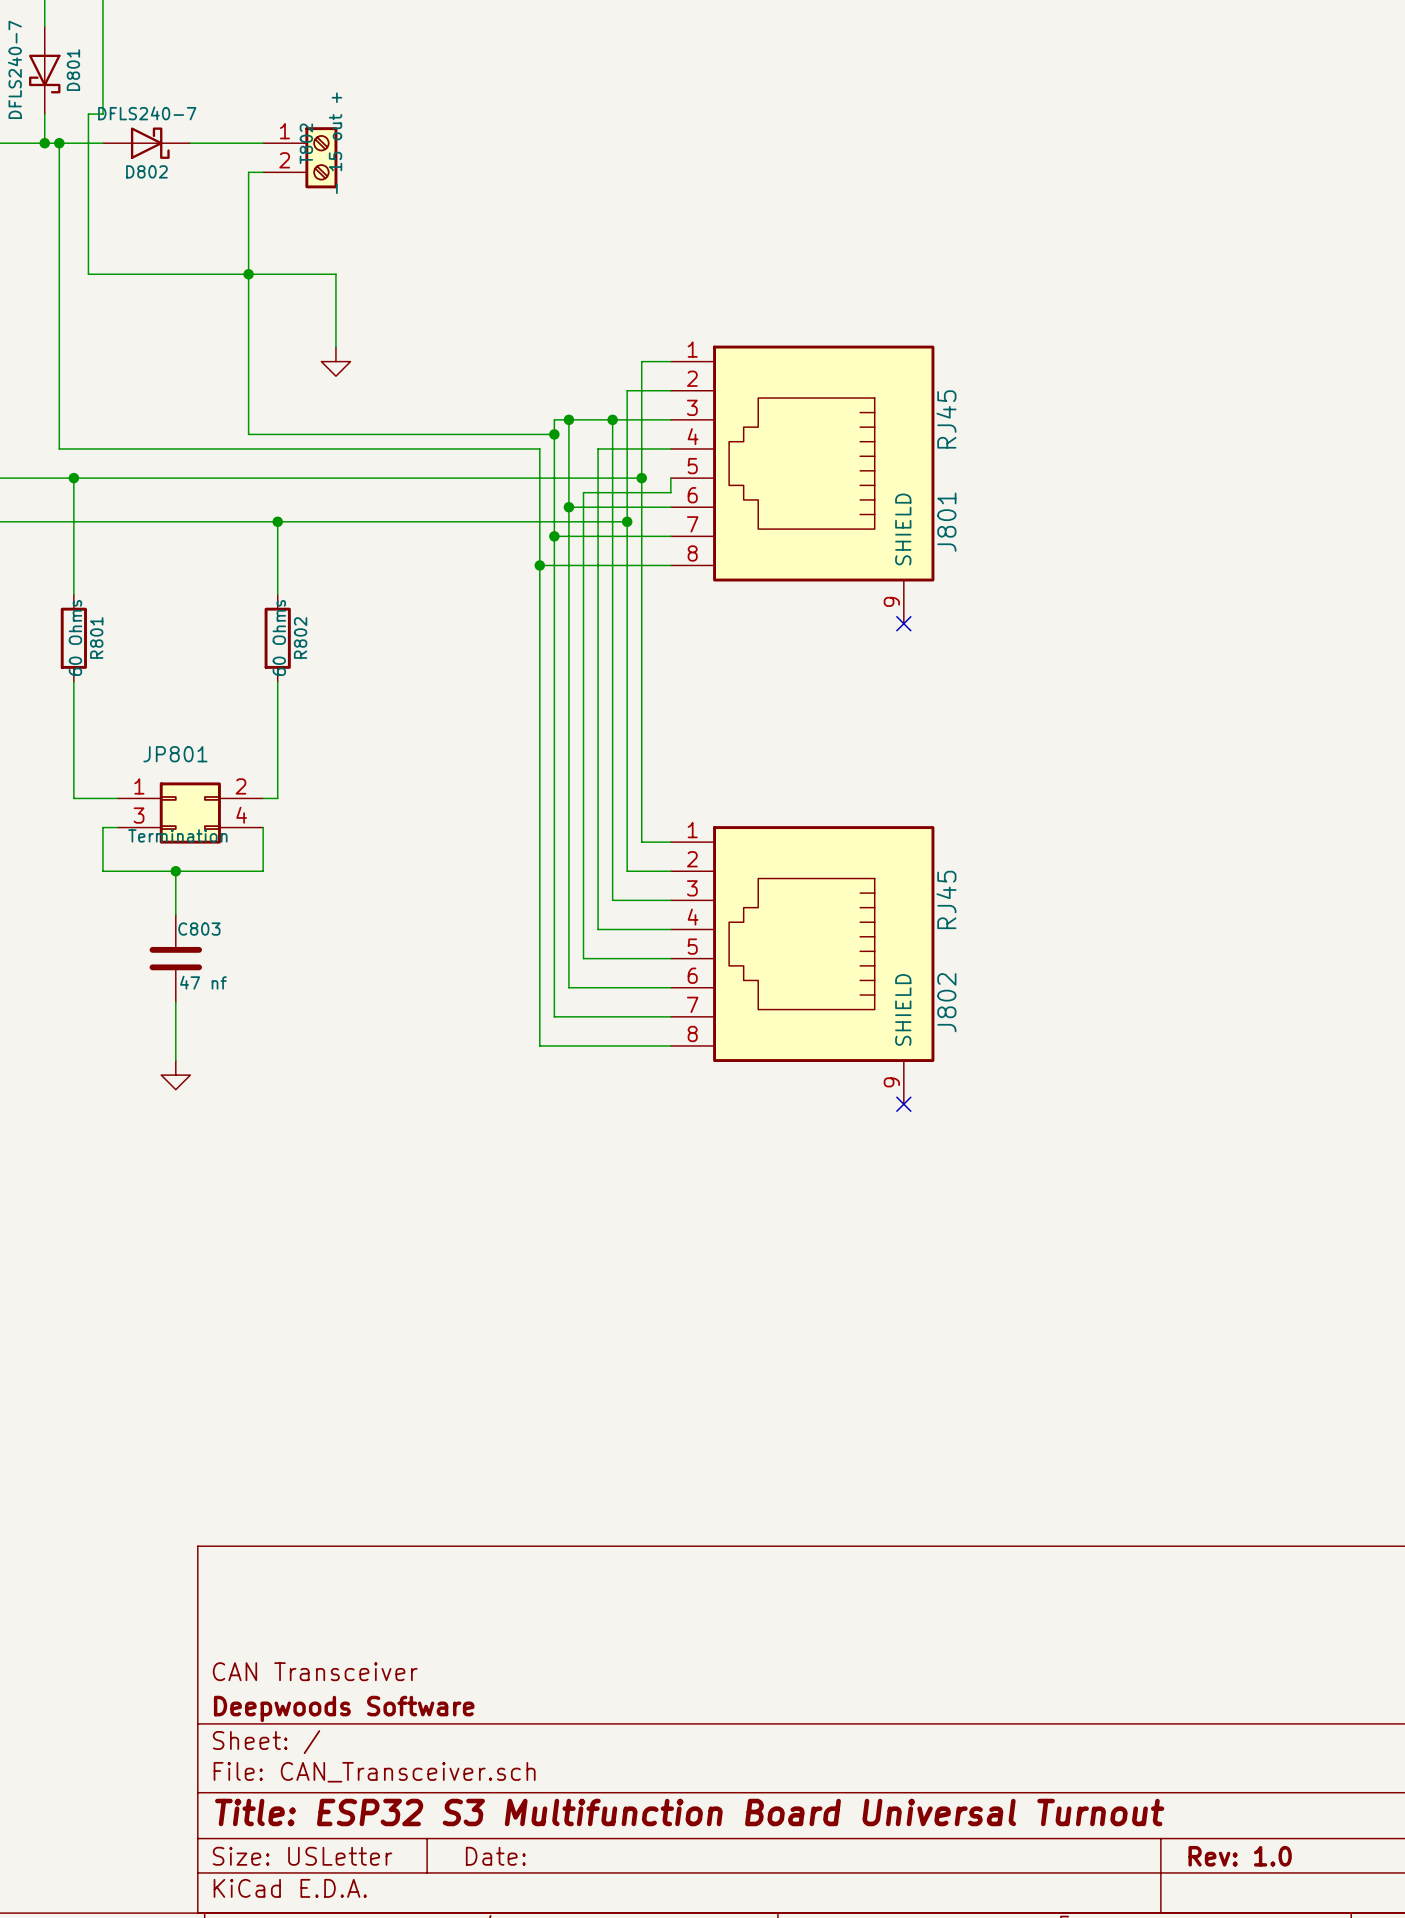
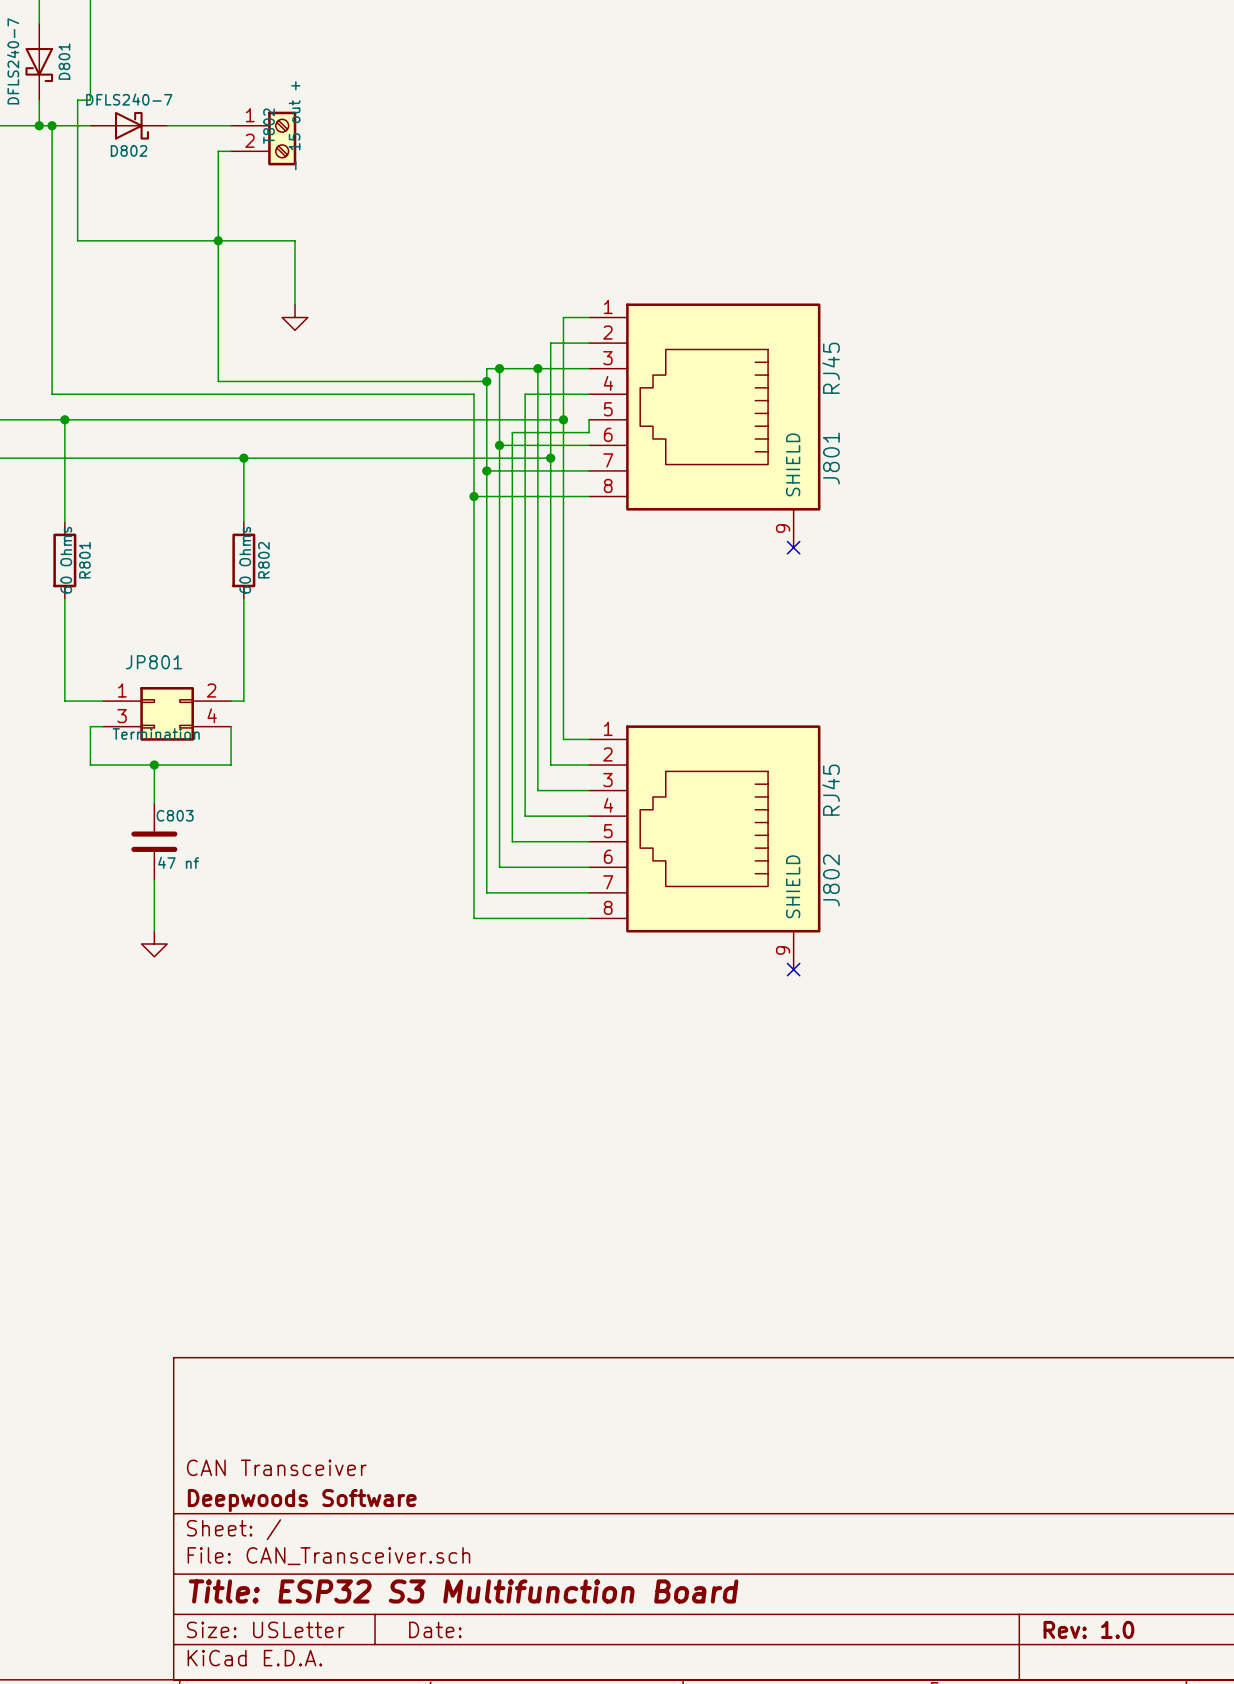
title block: Title: ESP32 S3 Multifunction Board Universal Turnout (689, 1812) -> Title: ESP32 S3 Multifunction Board (463, 1591)

